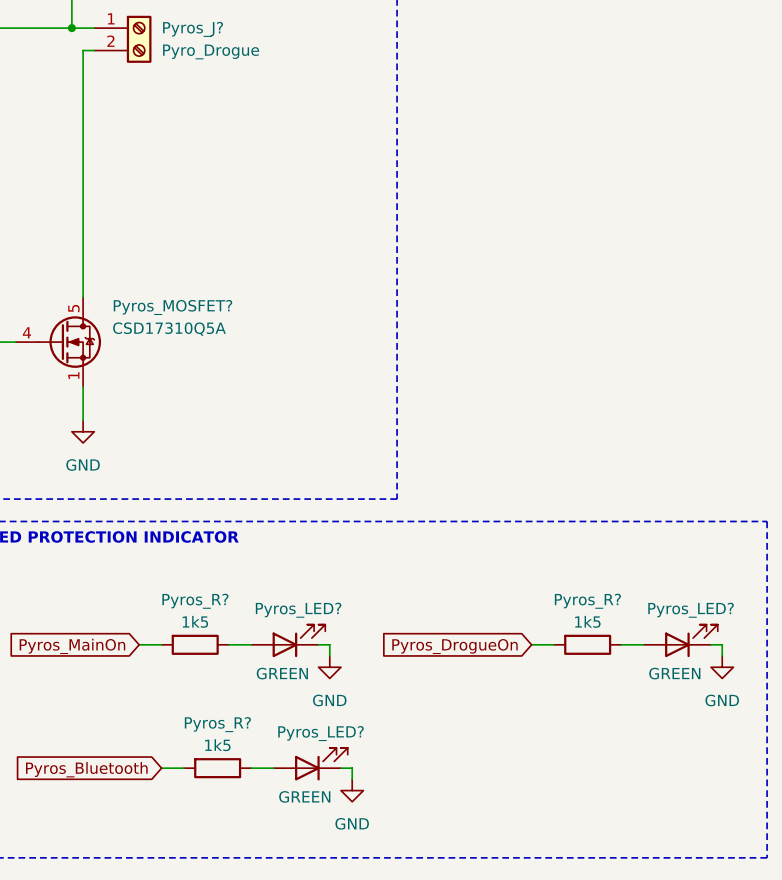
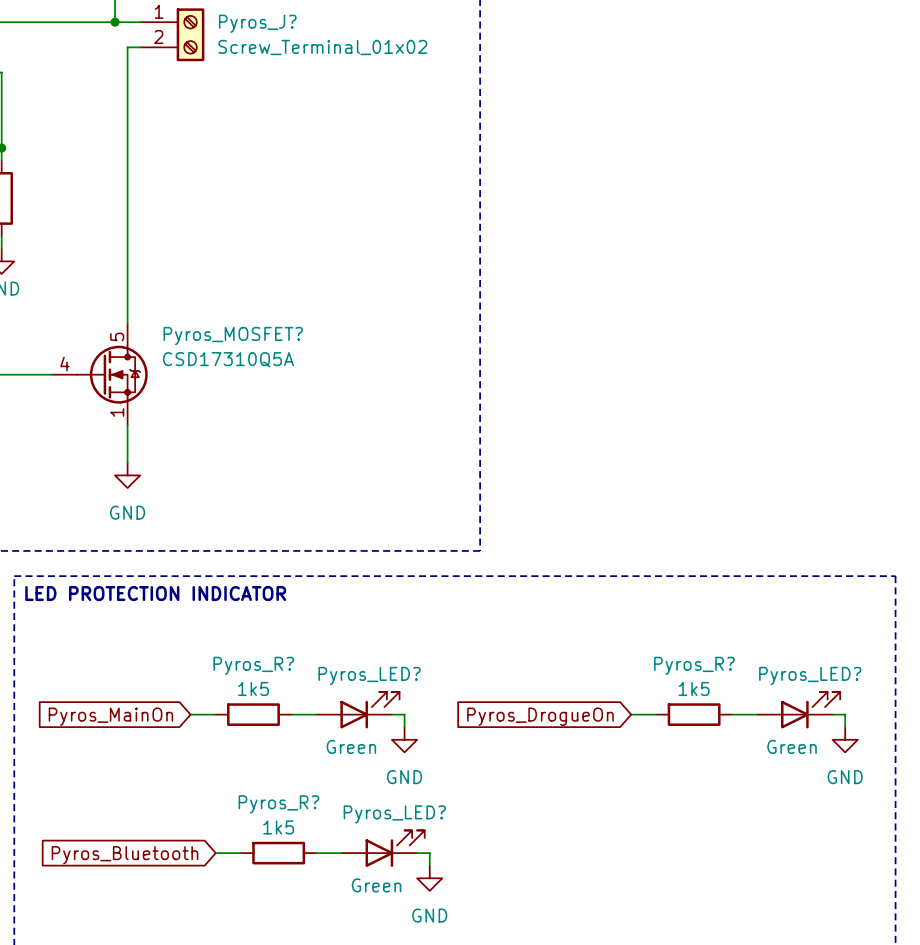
Pyros_J? value: Pyro_Drogue (211, 51) -> Screw_Terminal_01x02 (322, 47)
Pyros_LED? value: GREEN (282, 673) -> Green (351, 746)
Pyros_LED? value: GREEN (674, 673) -> Green (792, 746)
Pyros_LED? value: GREEN (304, 796) -> Green (376, 885)

